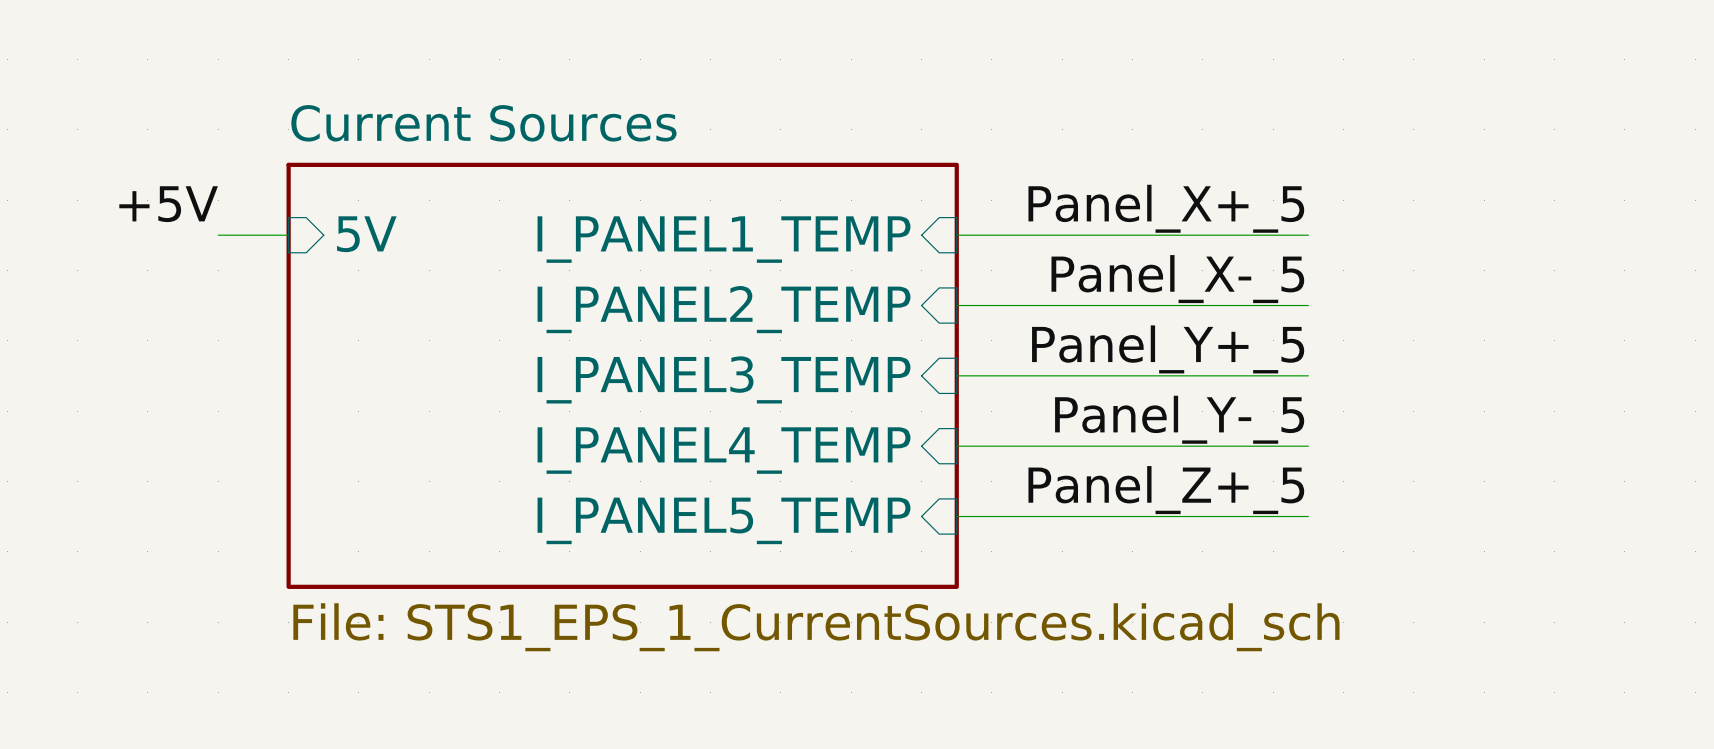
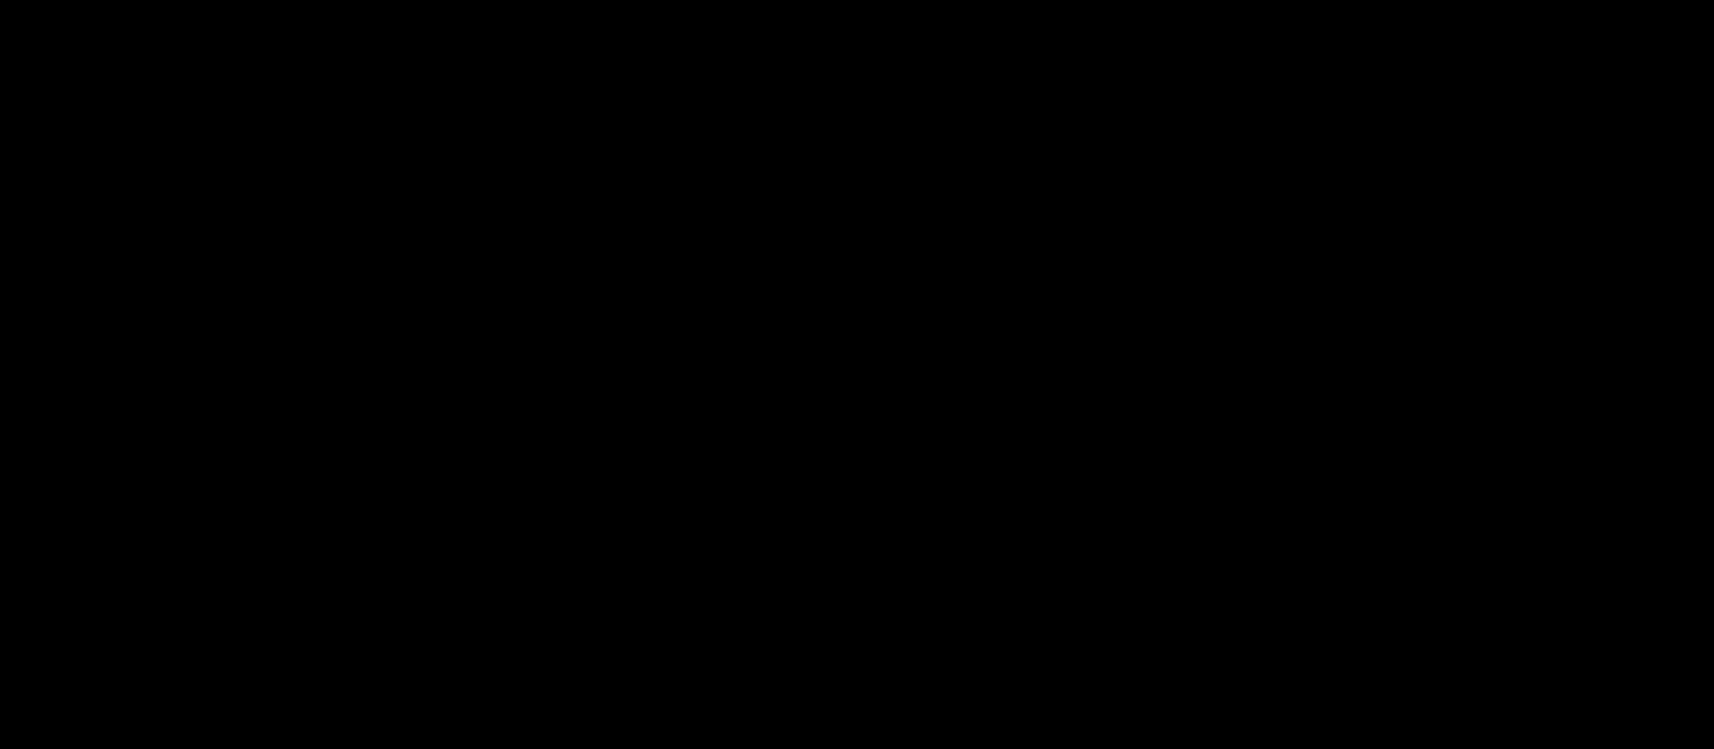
label: +5V (168, 204) -> none
label: Panel_X+_5 (1166, 208) -> none
sheet pin: 5V (366, 234) -> none
wire: (218, 235) (288, 235) -> none
wire: (956, 235) (1308, 235) -> none
sheet pin: I_PANEL1_TEMP (724, 239) -> none
label: Panel_X-_5 (1177, 279) -> none
wire: (956, 305) (1308, 305) -> none
sheet pin: I_PANEL2_TEMP (724, 309) -> none
label: Panel_Y+_5 (1168, 349) -> none
sheet Current Sources: File: STS1_EPS_1_CurrentSources.kicad_sch (622, 375) -> none
wire: (956, 375) (1308, 375) -> none
sheet pin: I_PANEL3_TEMP (724, 379) -> none
label: Panel_Y-_5 (1179, 419) -> none
wire: (956, 446) (1308, 446) -> none
sheet pin: I_PANEL4_TEMP (724, 450) -> none
label: Panel_Z+_5 (1166, 490) -> none
wire: (956, 516) (1308, 516) -> none
sheet pin: I_PANEL5_TEMP (724, 520) -> none

